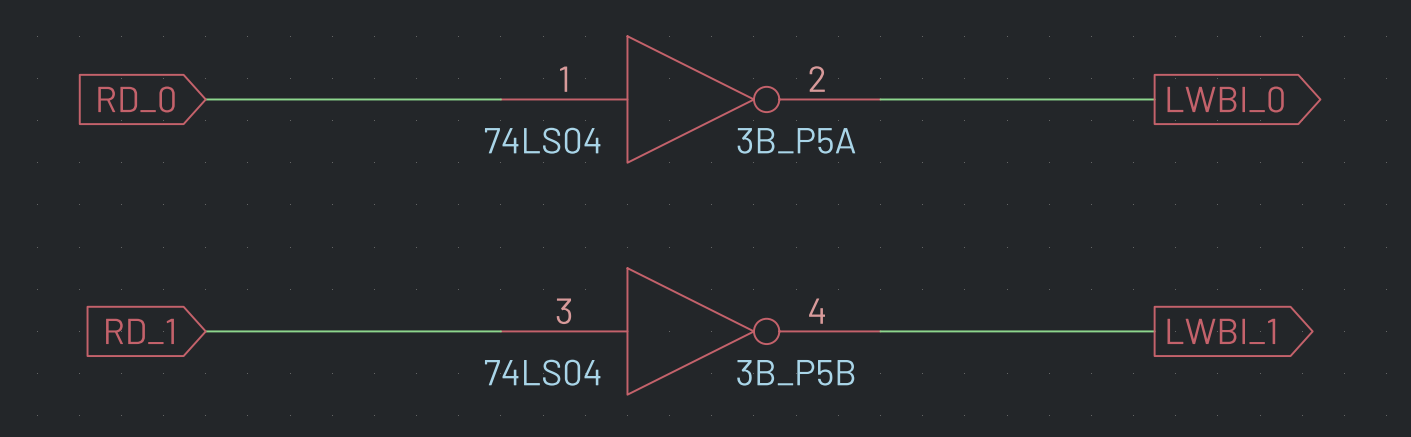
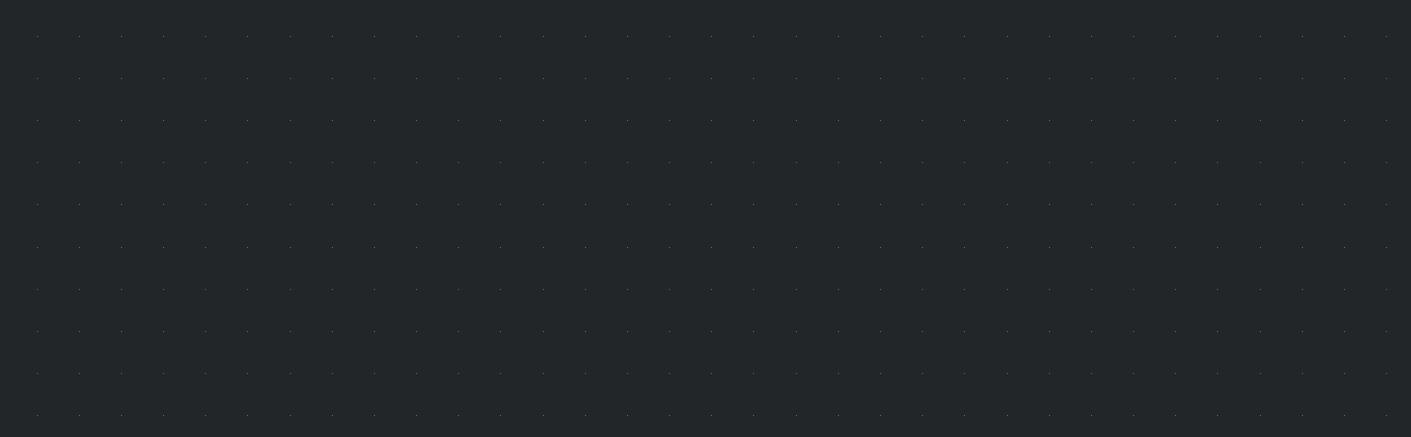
global label: RD_0 (136, 99) -> none
wire: (205, 99) (500, 99) -> none
3B_P5A: 74LS04 (690, 99) -> none
wire: (880, 99) (1154, 99) -> none
global label: LWBI_0 (1225, 99) -> none
global label: RD_1 (140, 331) -> none
wire: (205, 331) (500, 331) -> none
3B_P5B: 74LS04 (690, 331) -> none
wire: (880, 331) (1154, 331) -> none
global label: LWBI_1 (1221, 331) -> none

